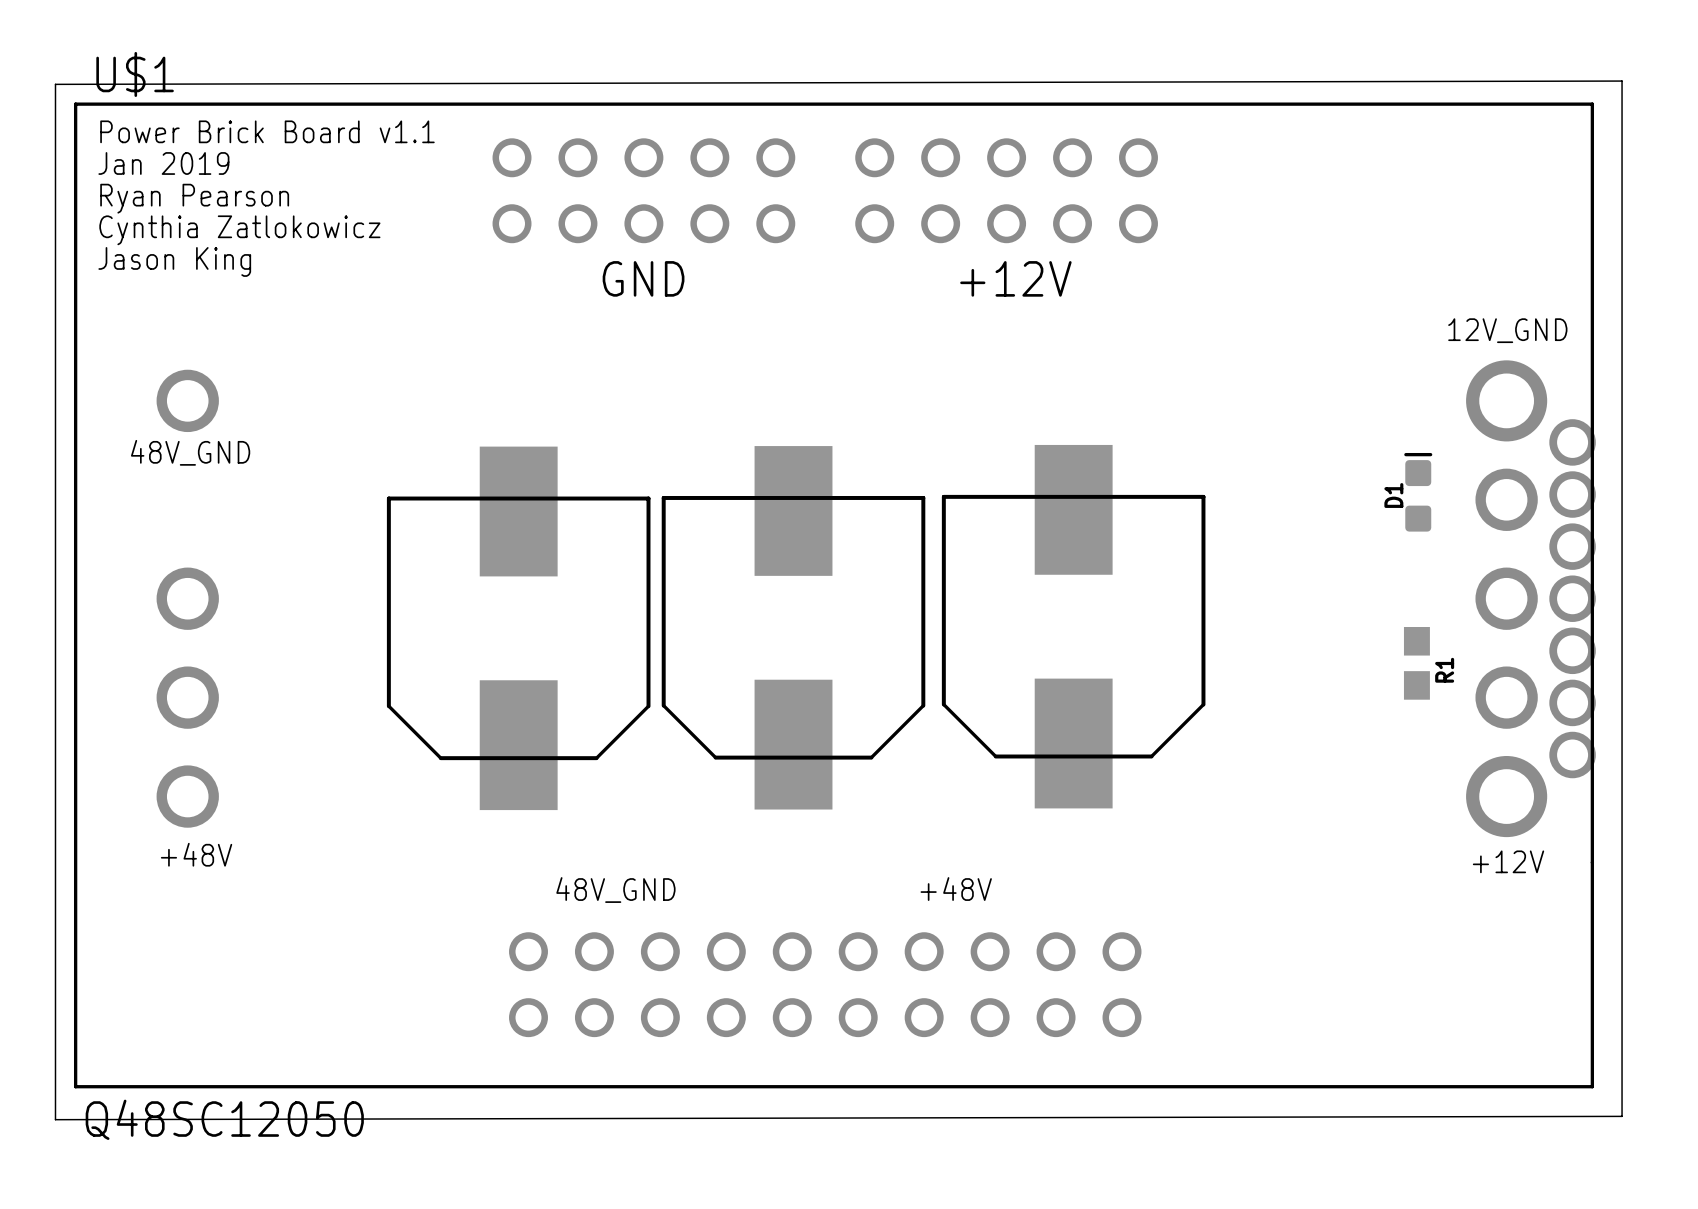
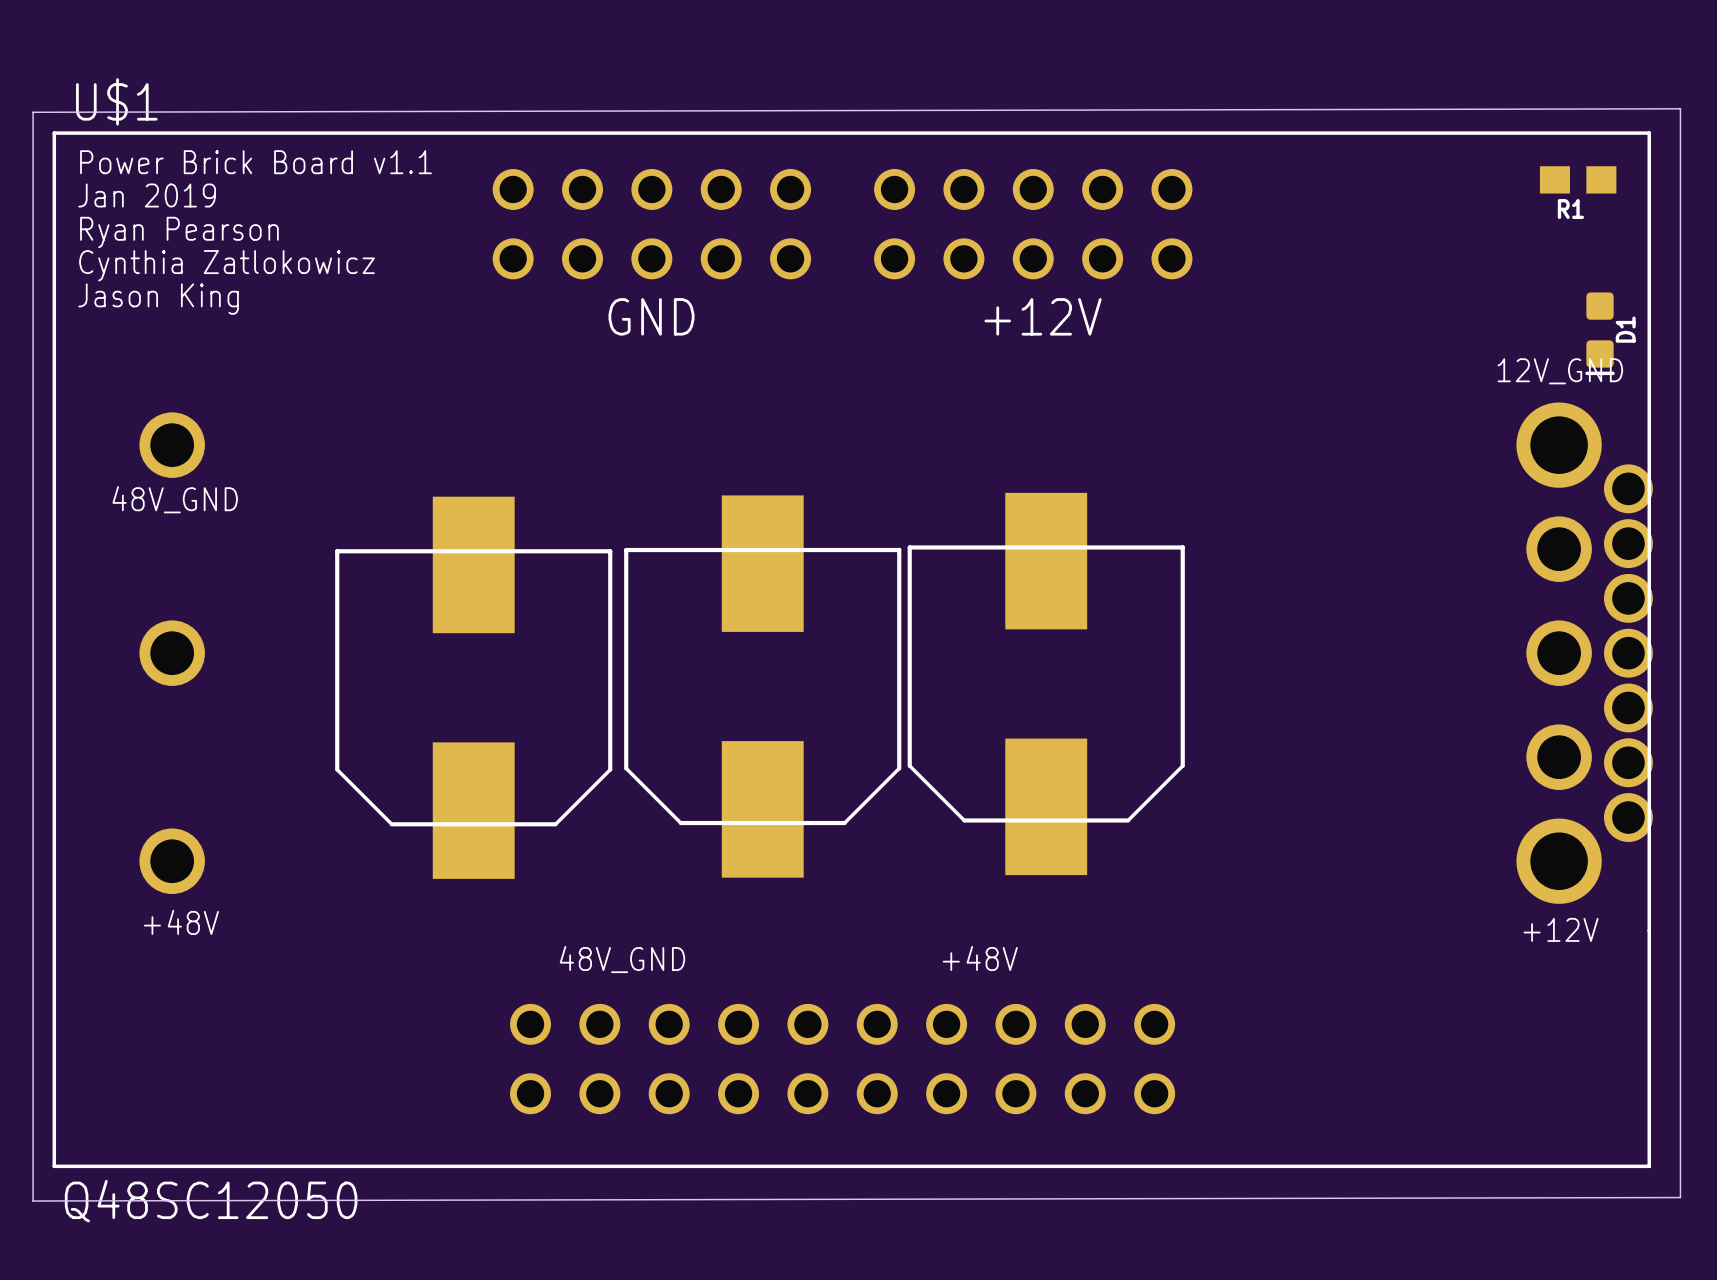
U$1 footprint: [73, 102, 1596, 1089] -> [52, 131, 1653, 1169]
D1 rotation: 0° (1418, 492) -> 180° (1600, 333)
D1 position: (1418, 492) -> (1600, 333)
part position: (1073, 626) -> (1046, 683)
part position: (793, 627) -> (762, 686)
part position: (518, 628) -> (473, 687)
R1 rotation: 0° (1416, 663) -> 90° clockwise (1578, 179)
R1 position: (1416, 663) -> (1578, 179)

